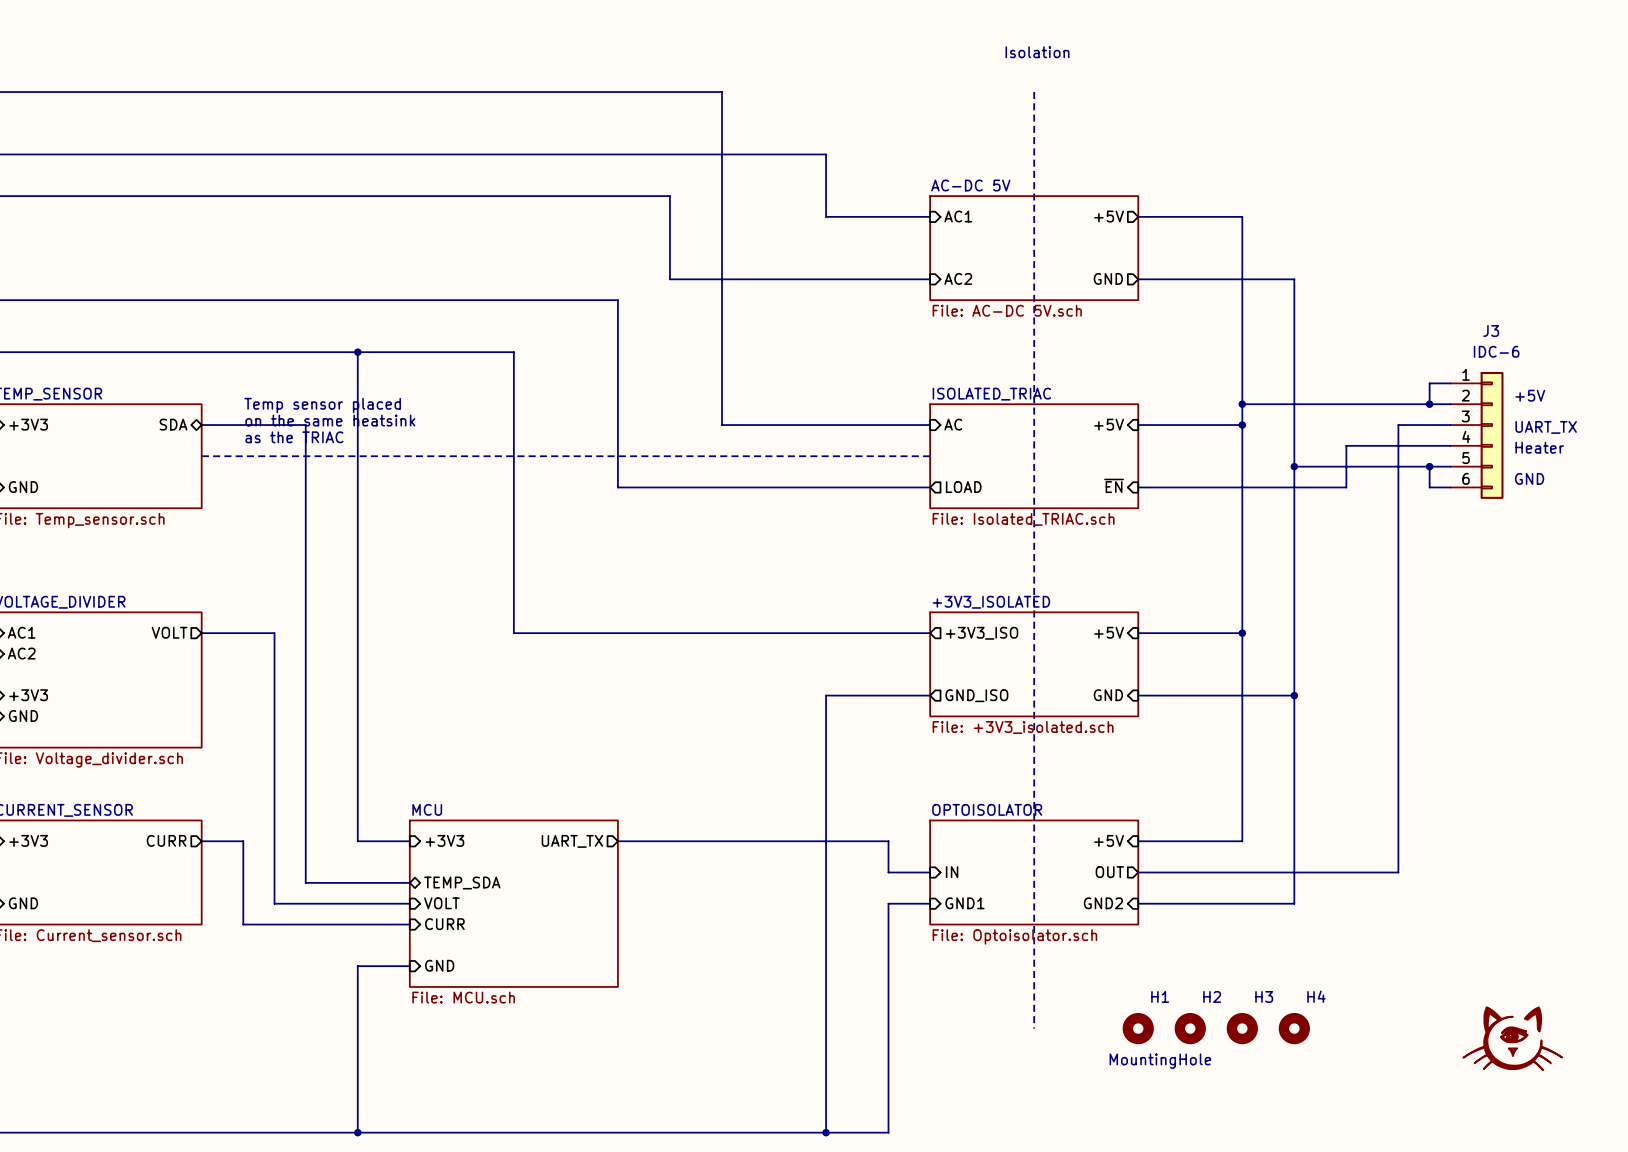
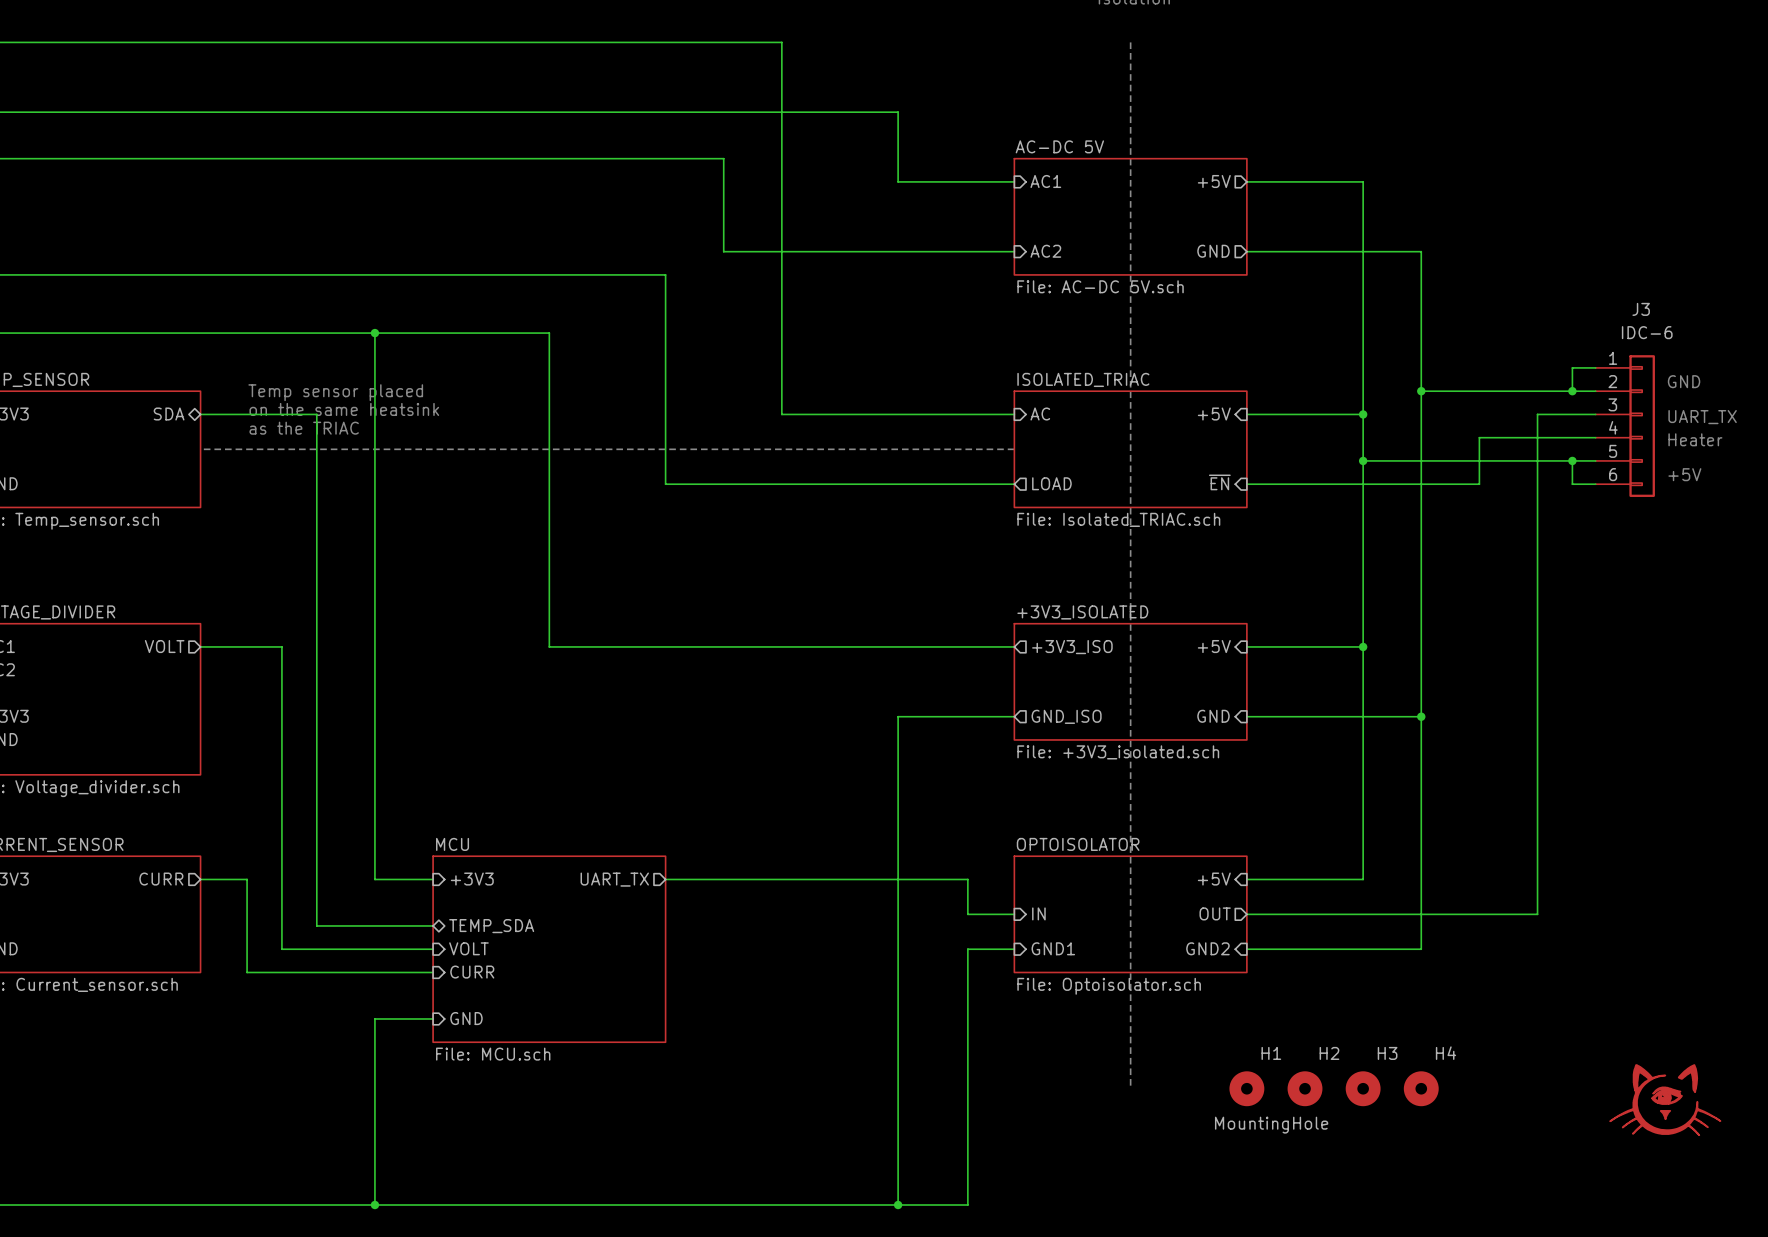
text: +5V (1530, 395) -> GND (1684, 381)
wire: (1242, 404) (1294, 404) -> (1363, 460) (1421, 460)
junction: (1242, 404) -> none
junction: none -> (1421, 391)
junction: none -> (1363, 460)
junction: (1294, 466) -> none
text: GND (1529, 478) -> +5V (1684, 474)

